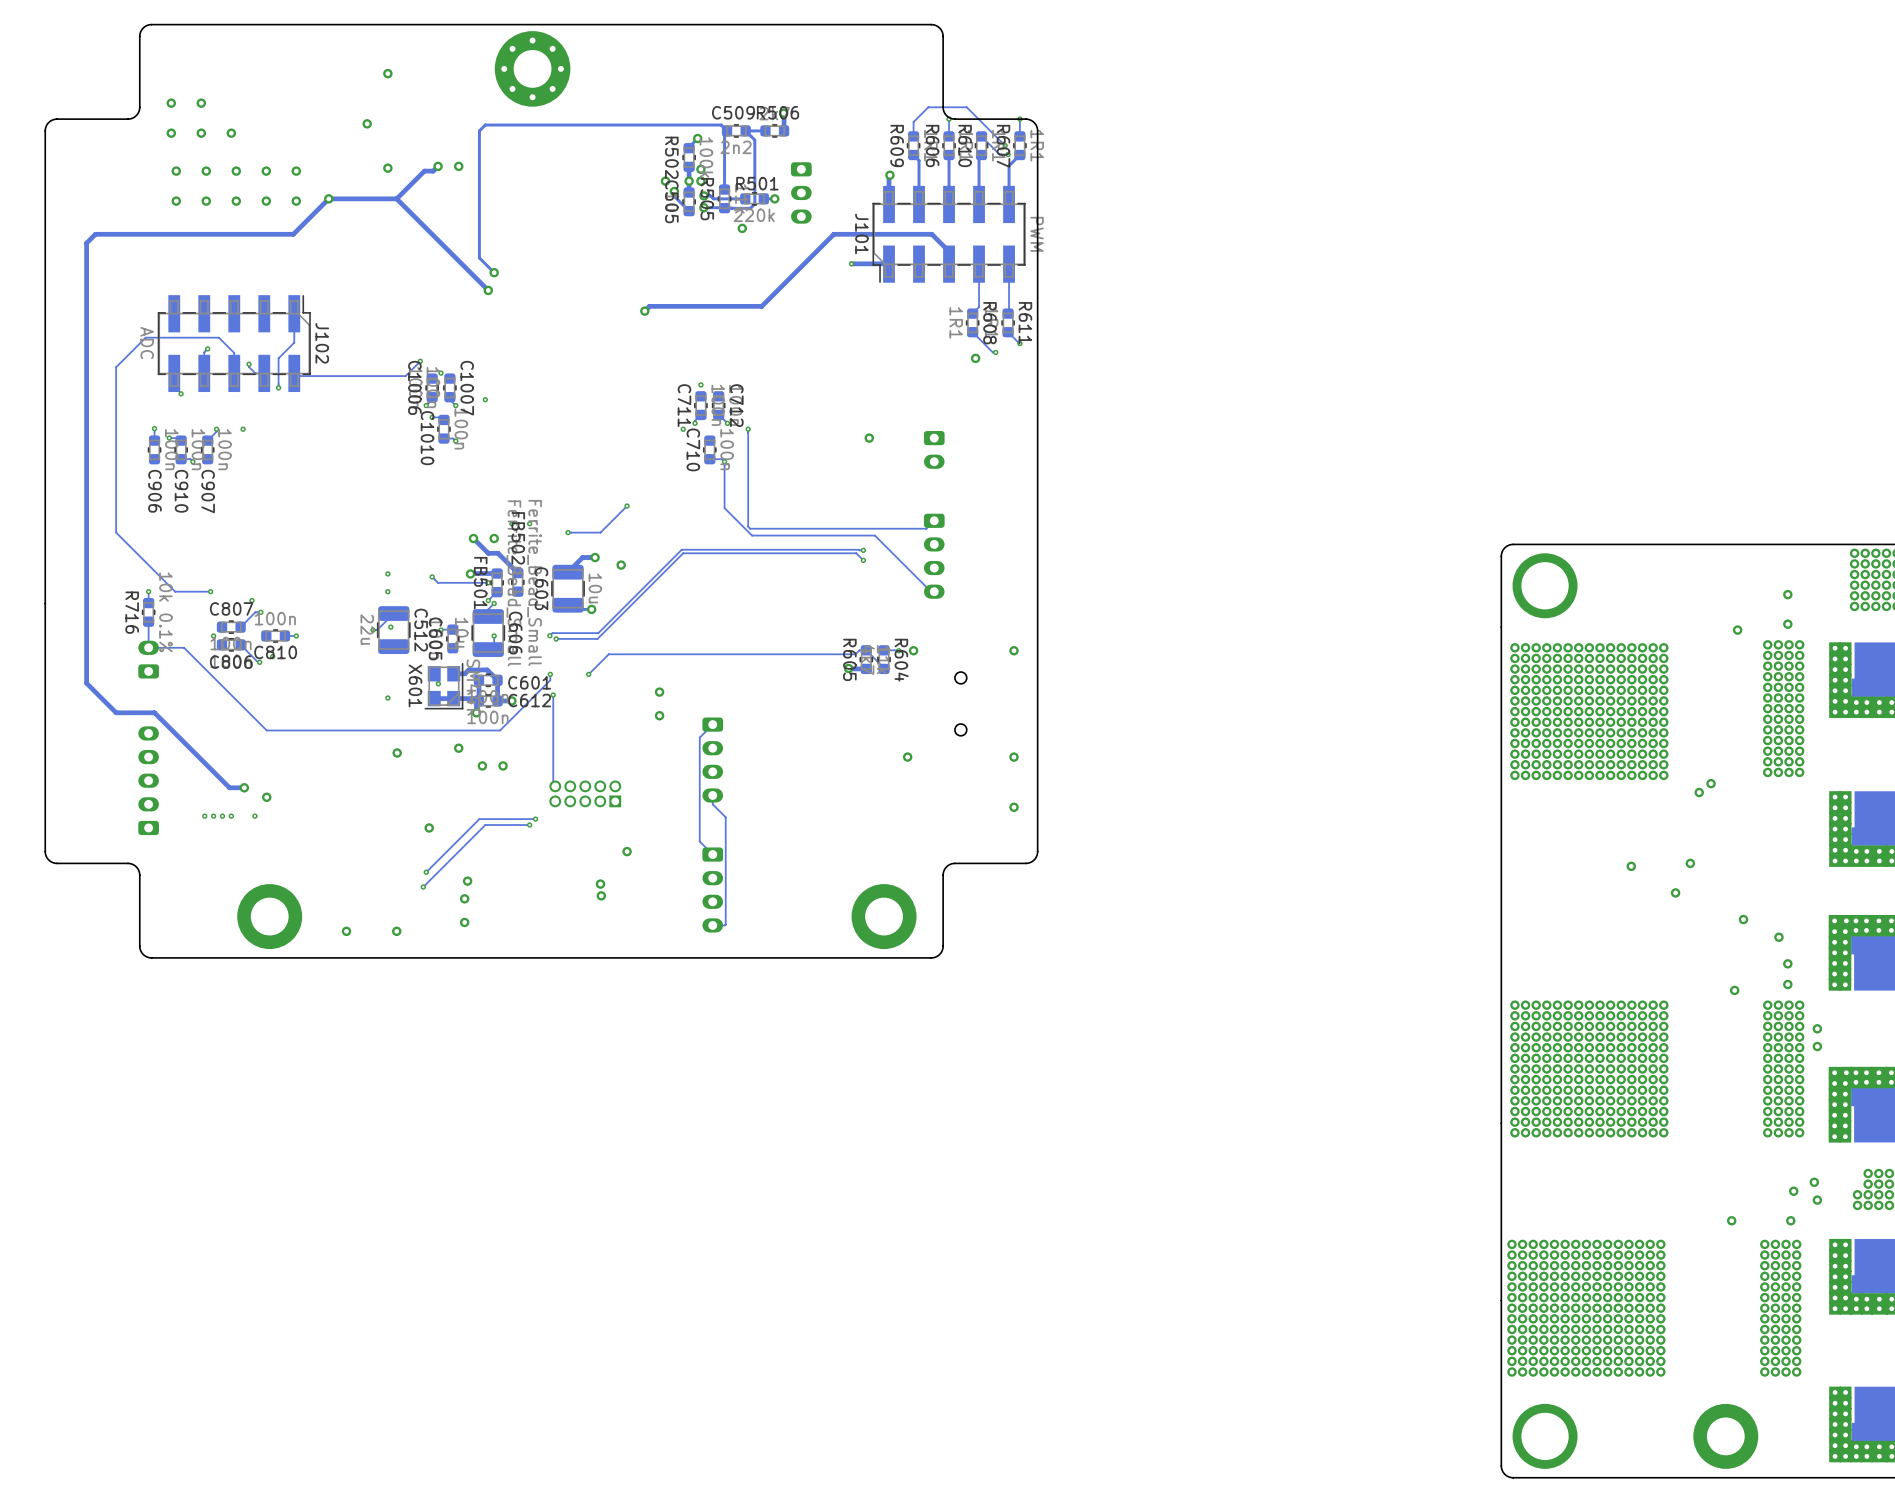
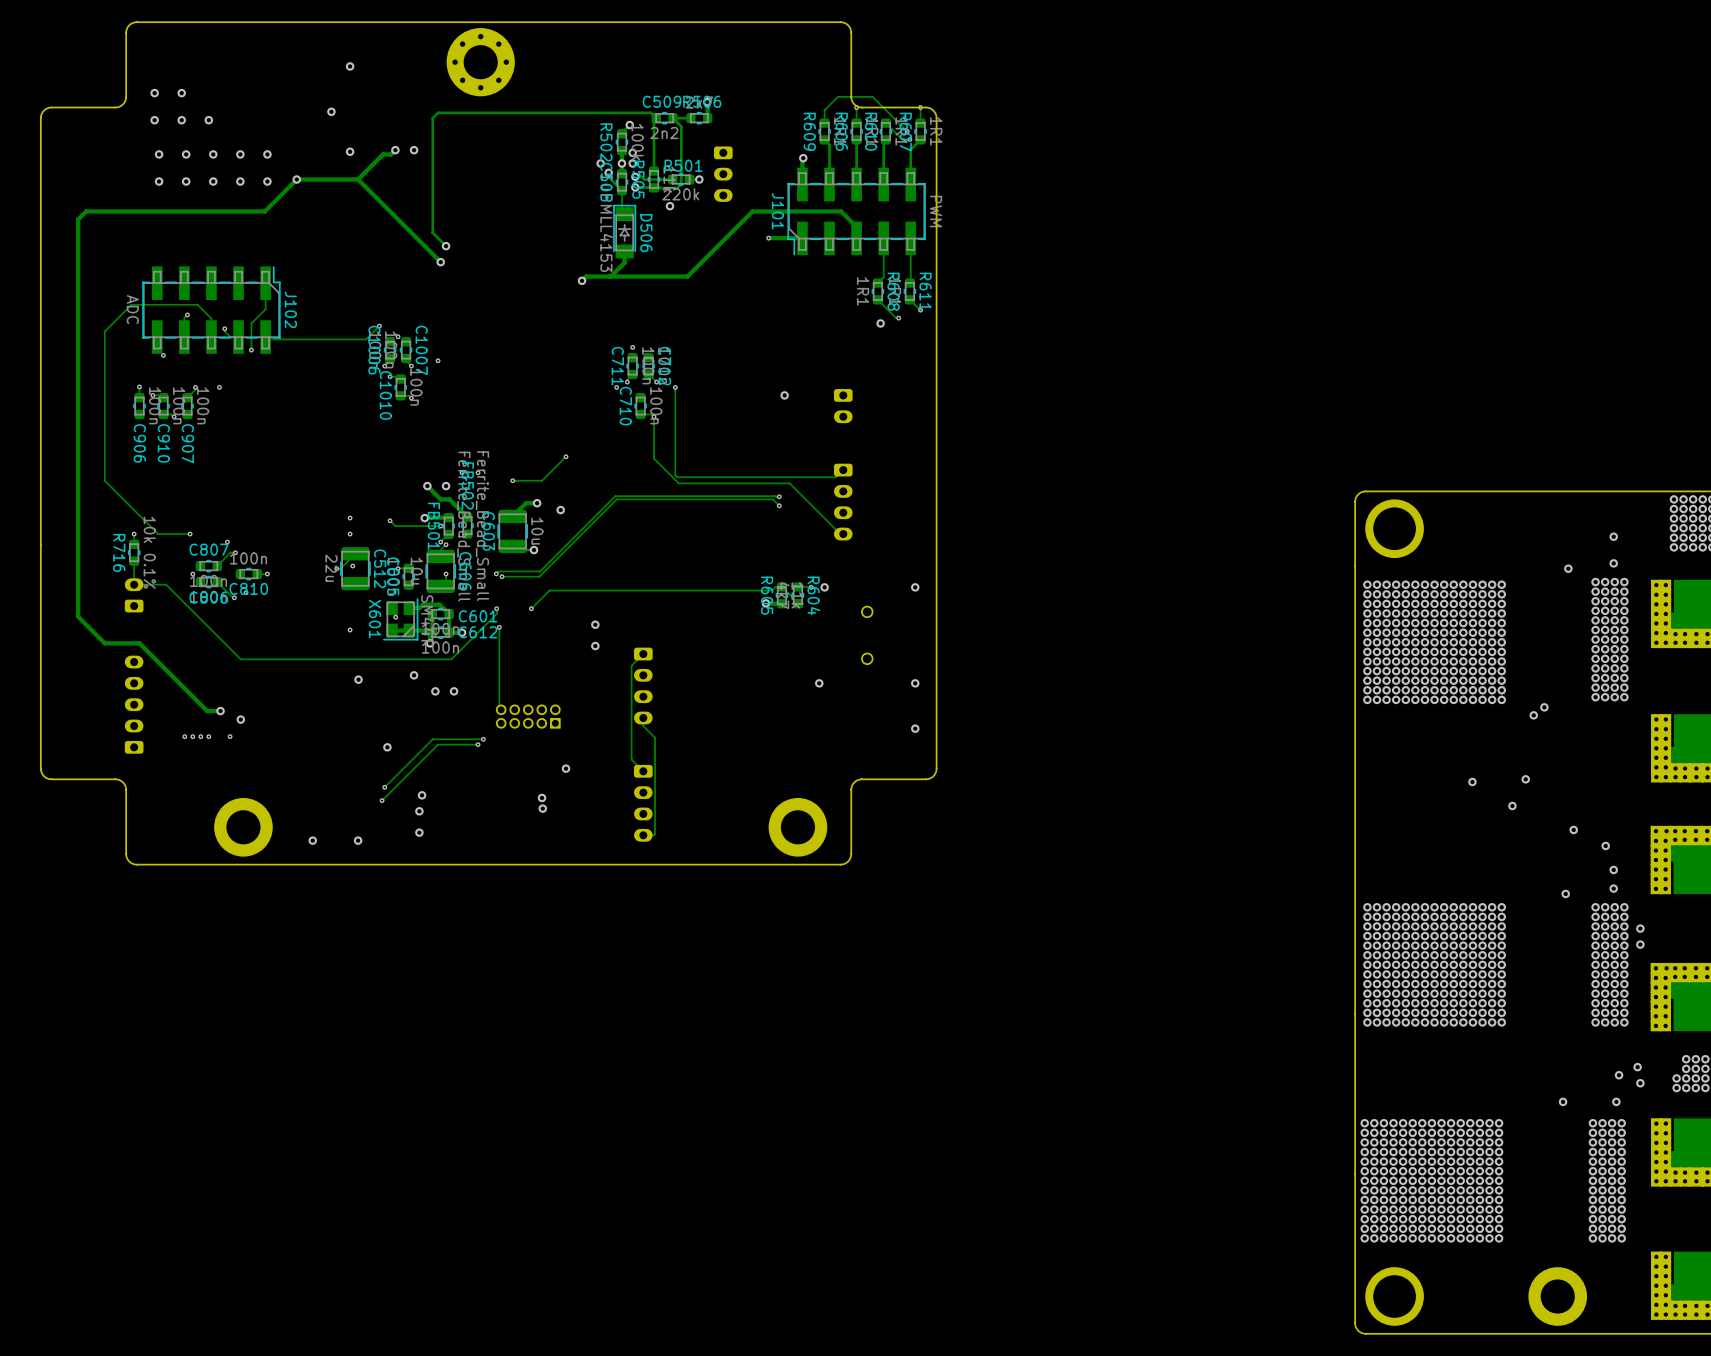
track: none -> (622, 190) (622, 211) (624, 214)
D506: none -> PMLL4153 (624, 231)
track: none -> (624, 251) (624, 262) (610, 276)

